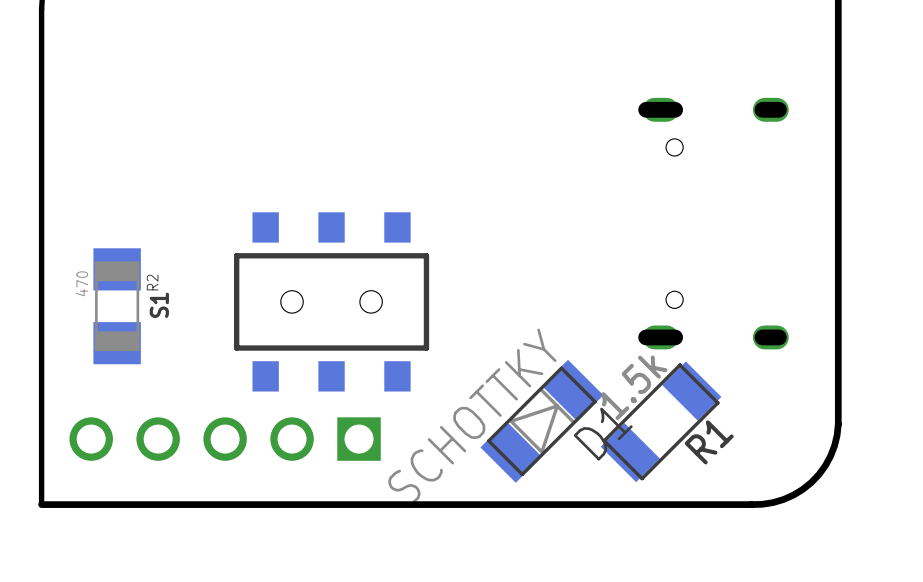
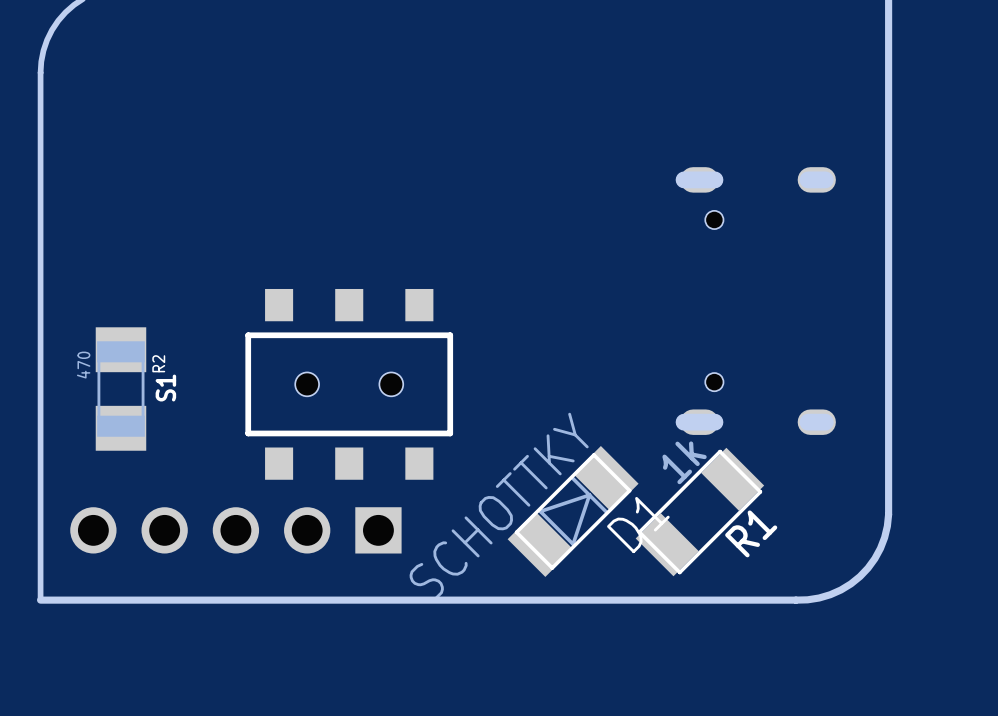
R1 value: 1.5k (634, 387) -> 1k (684, 462)

